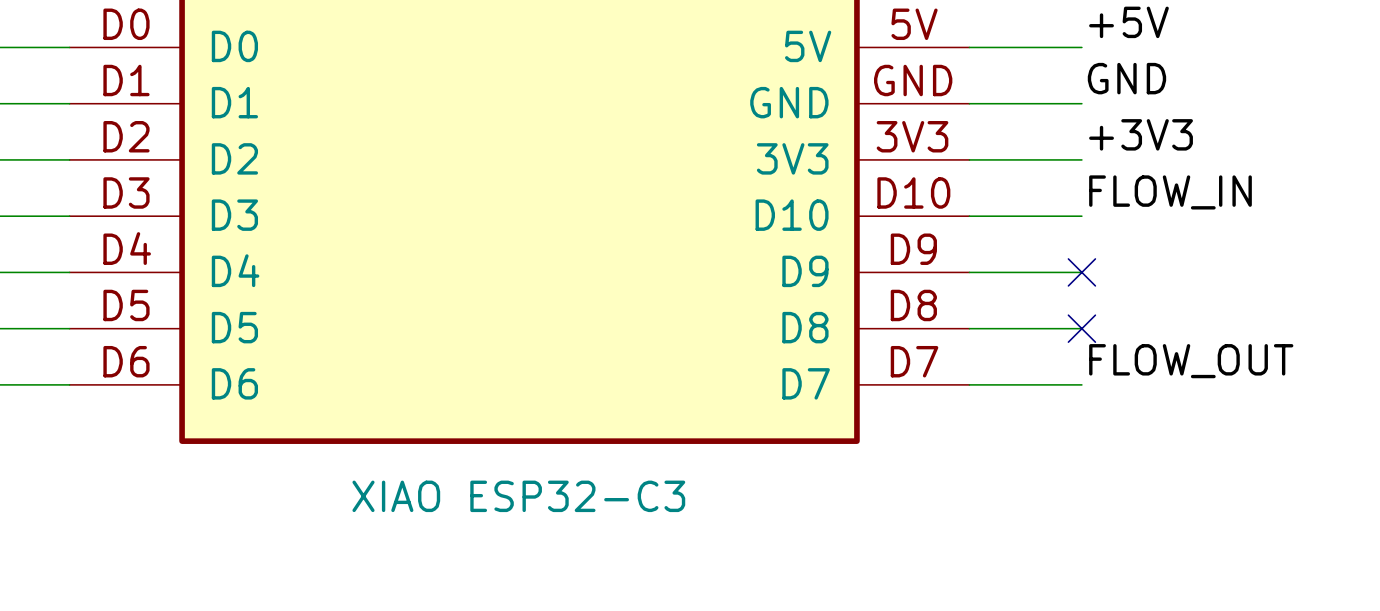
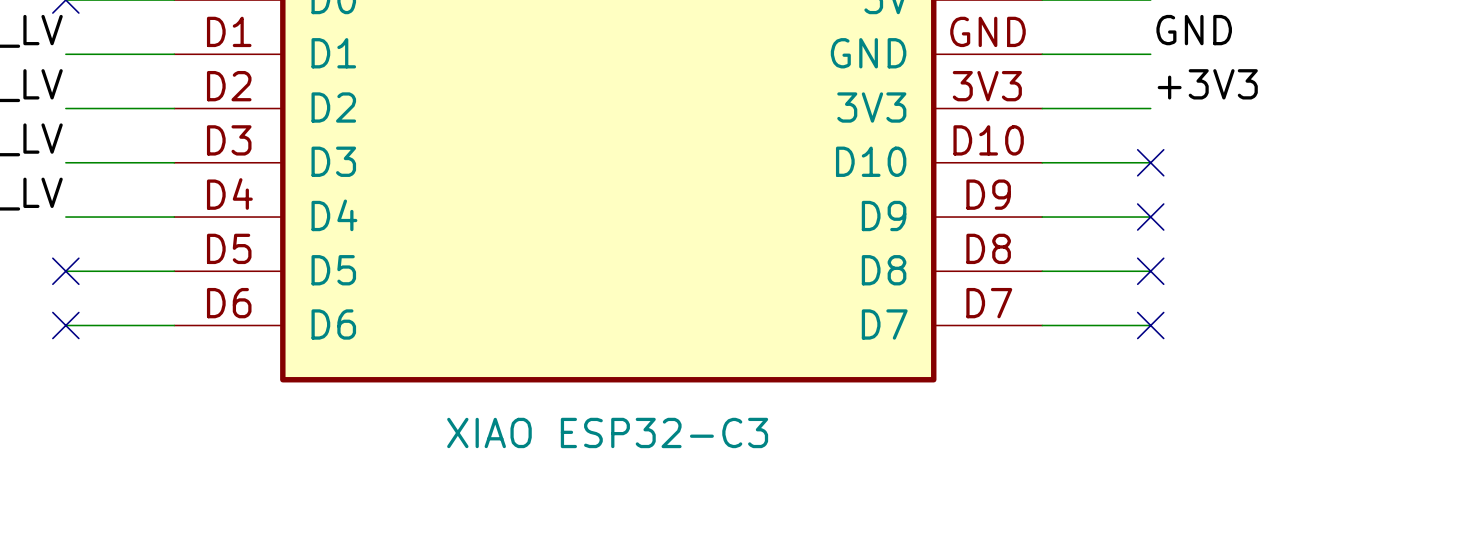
label: FLOW_IN (1170, 192) -> none
no-connect mark: none -> (1150, 162)
label: FLOW_OUT (1191, 361) -> none
no-connect mark: none -> (1150, 325)

